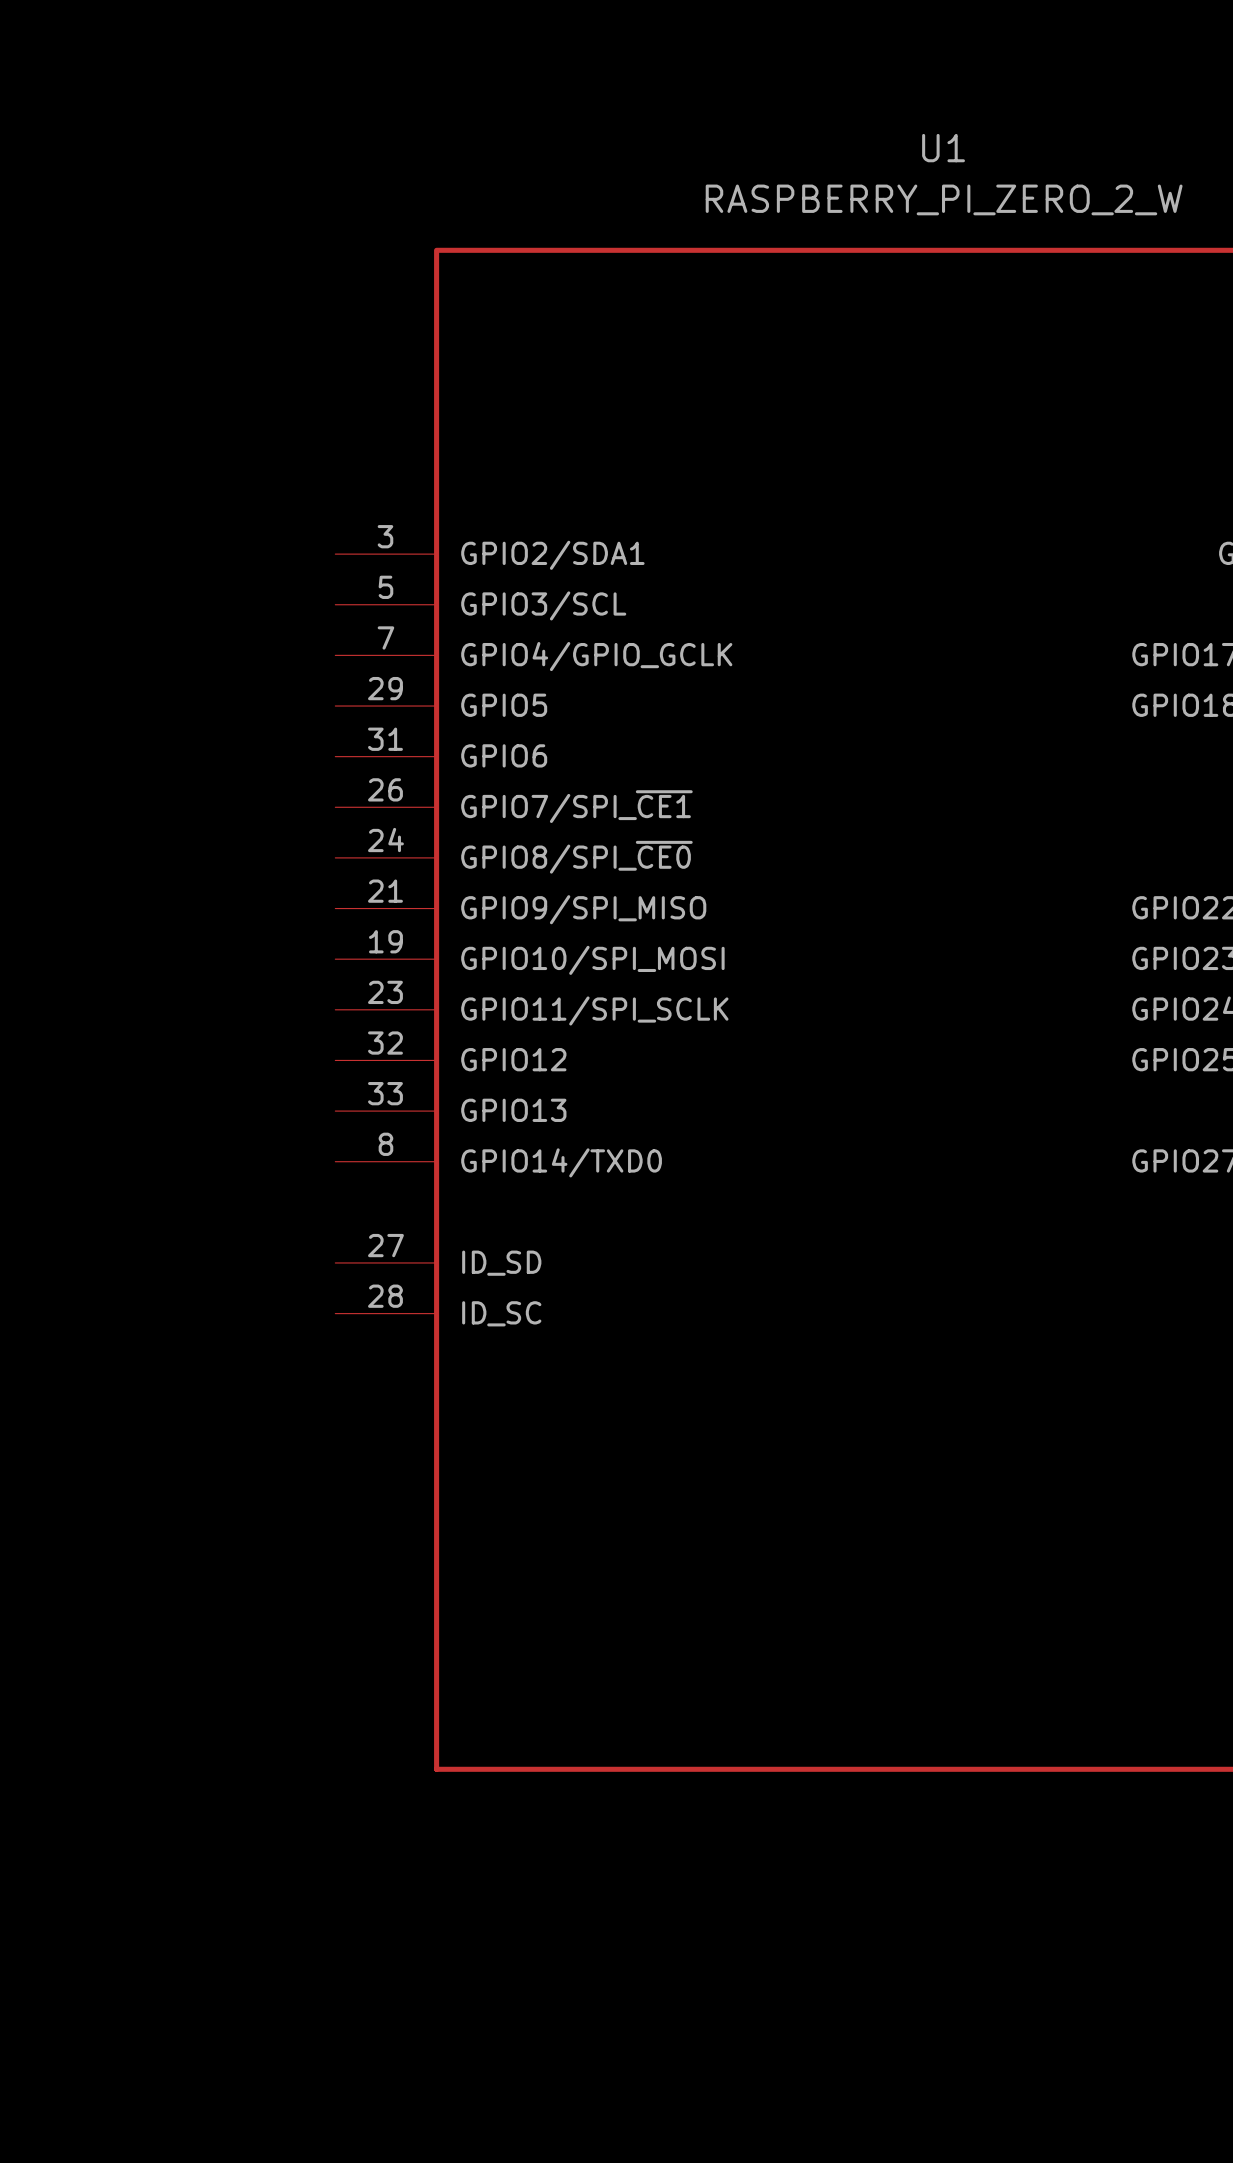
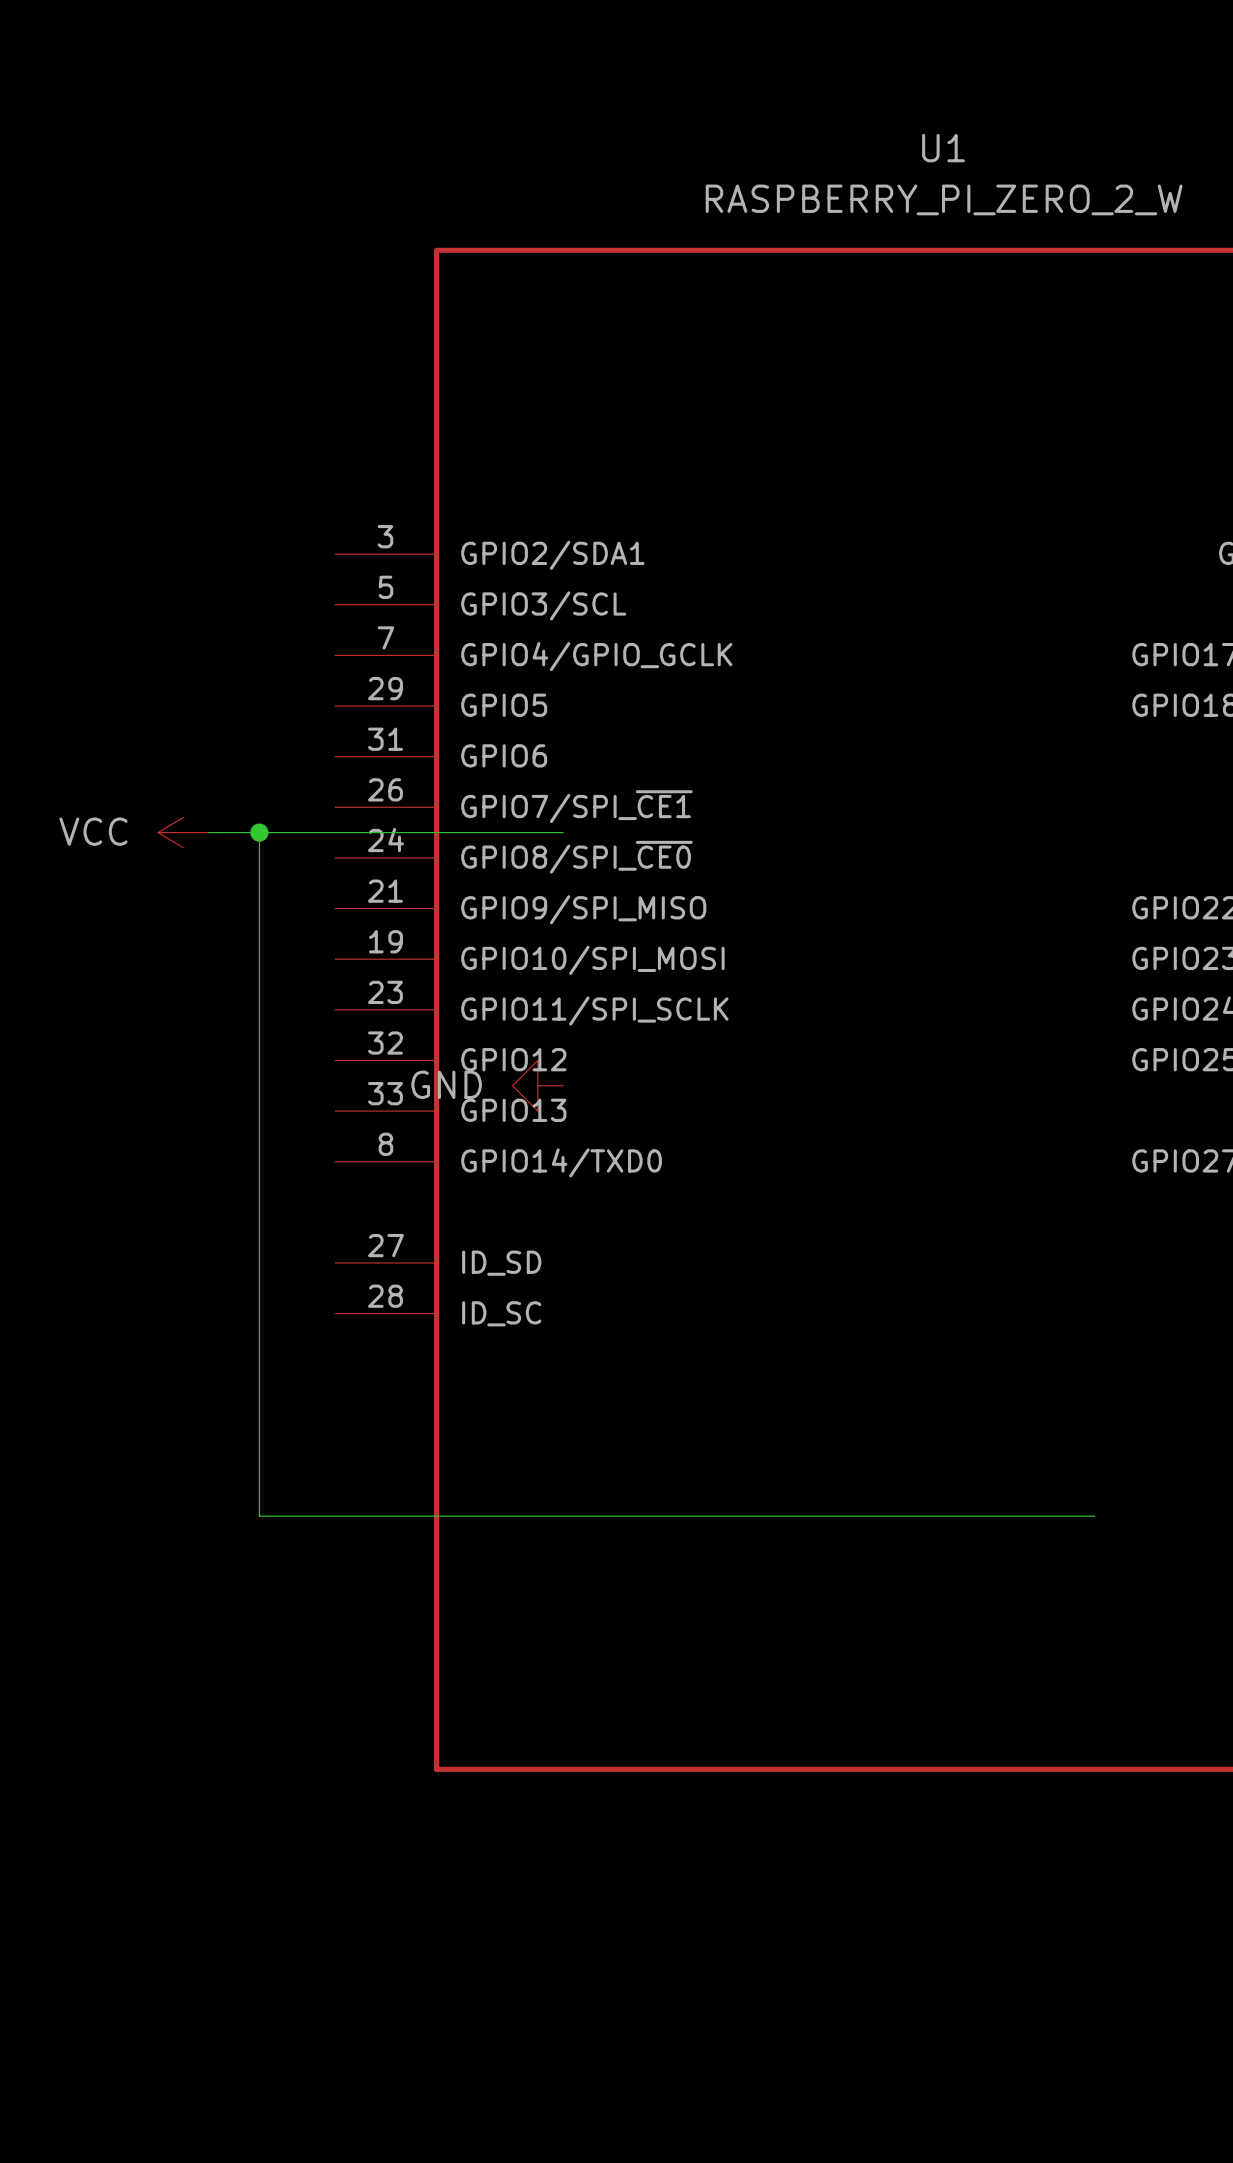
power symbol: none -> VCC (183, 832)
wire: none -> (208, 832) (563, 832)
wire: none -> (259, 832) (259, 1516) (1094, 1516)
junction: none -> (259, 832)
power symbol: none -> GND (537, 1085)

